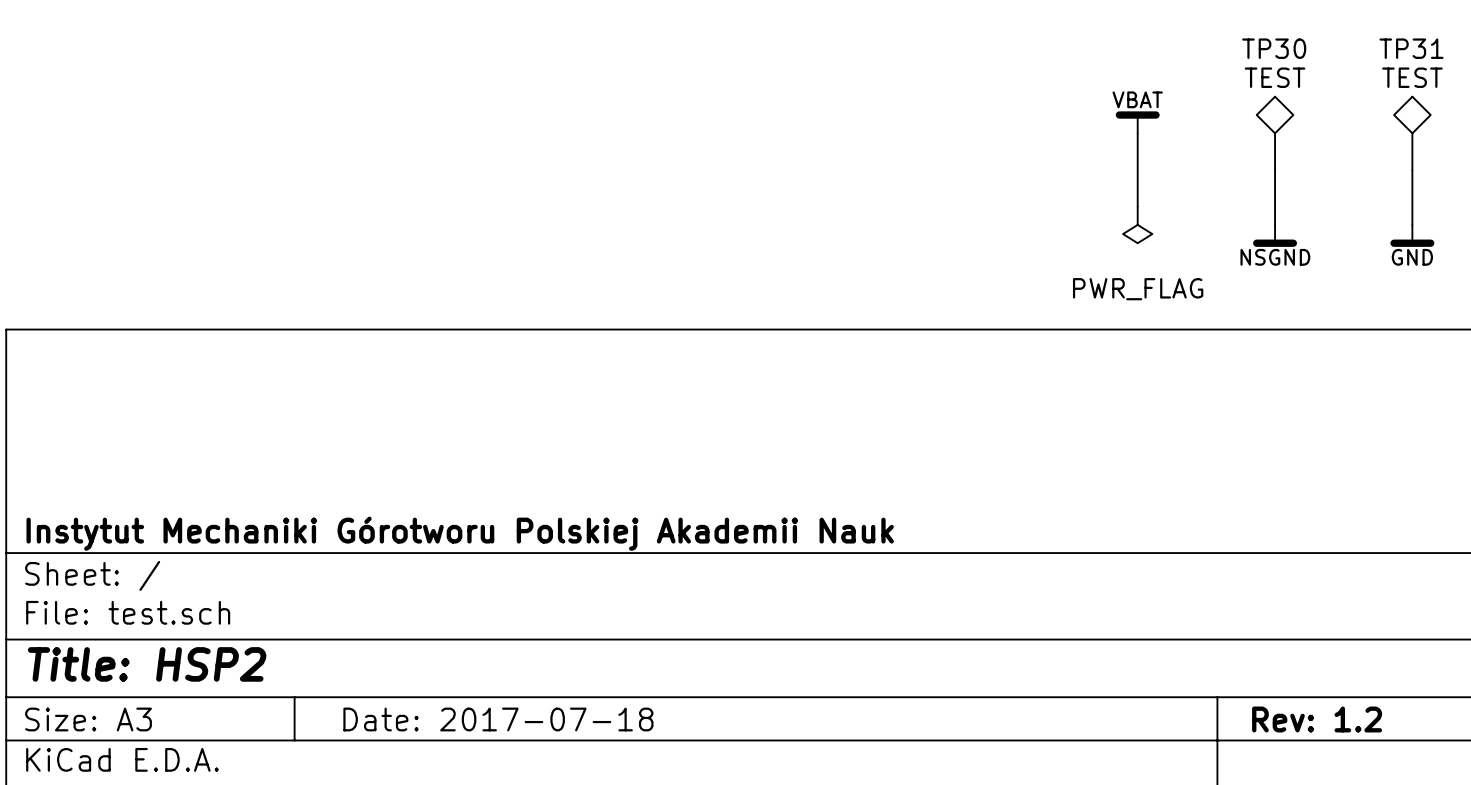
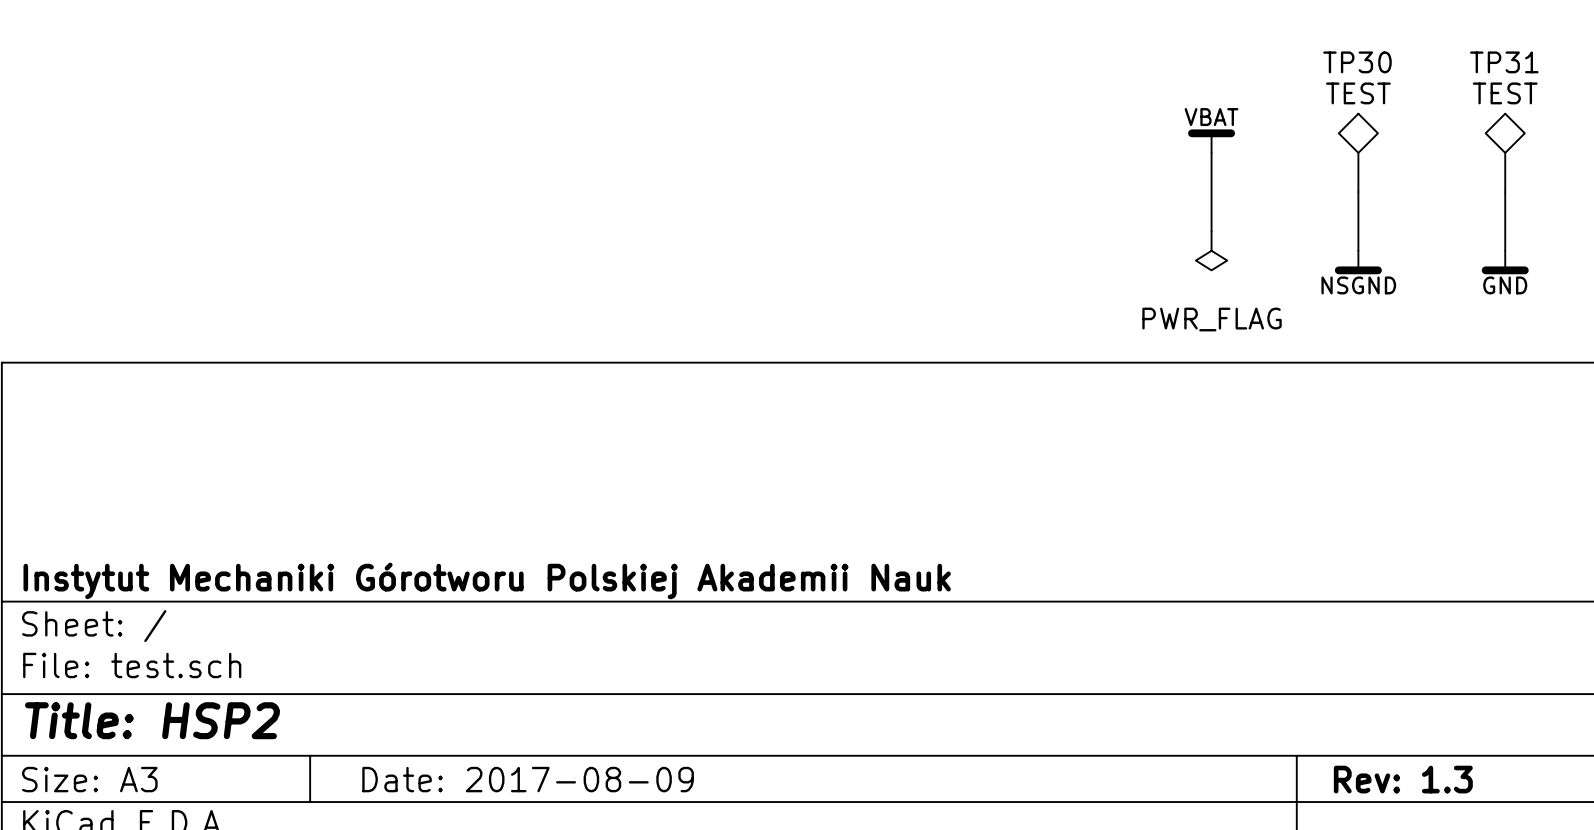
title block: Date: 2017-07-18 (498, 719) -> Date: 2017-08-09 (528, 779)
title block: Rev: 1.2 (1317, 719) -> Rev: 1.3 (1403, 779)

